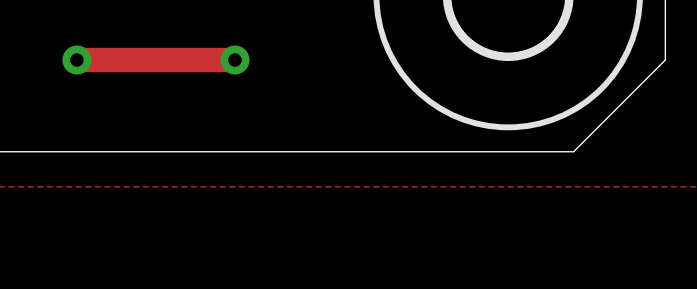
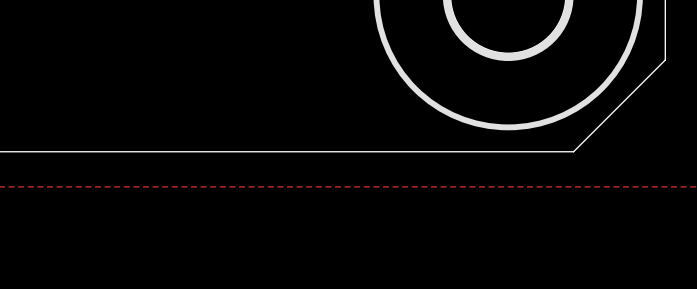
track: (76, 60) (234, 60) -> none
via: (76, 60) -> none
via: (234, 60) -> none

